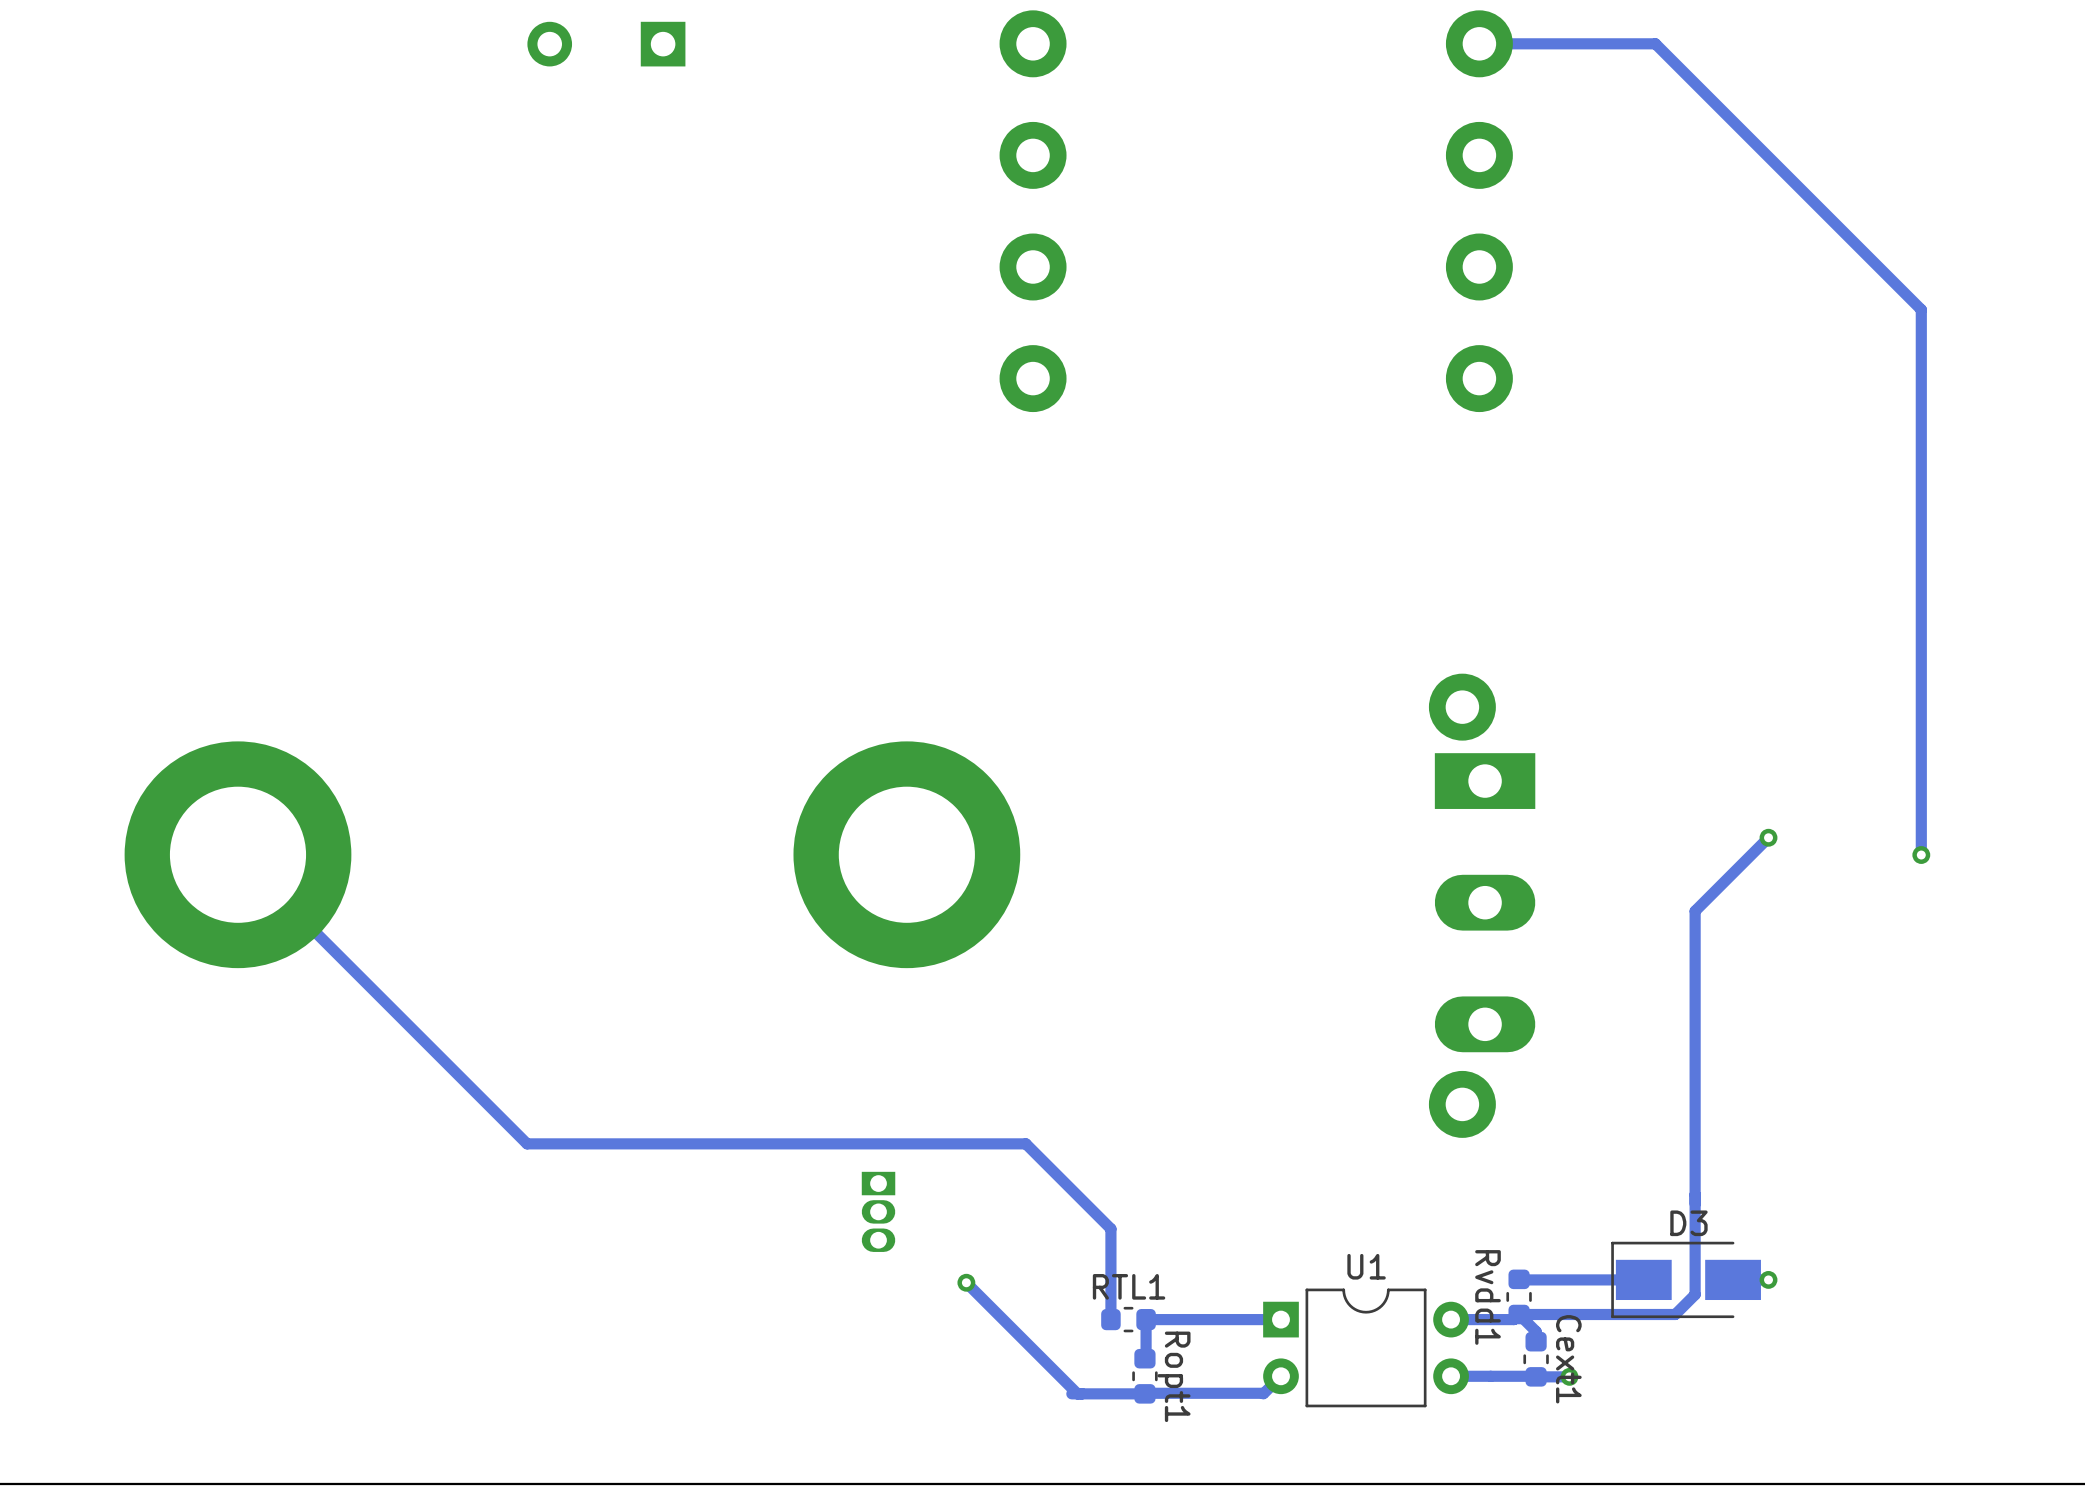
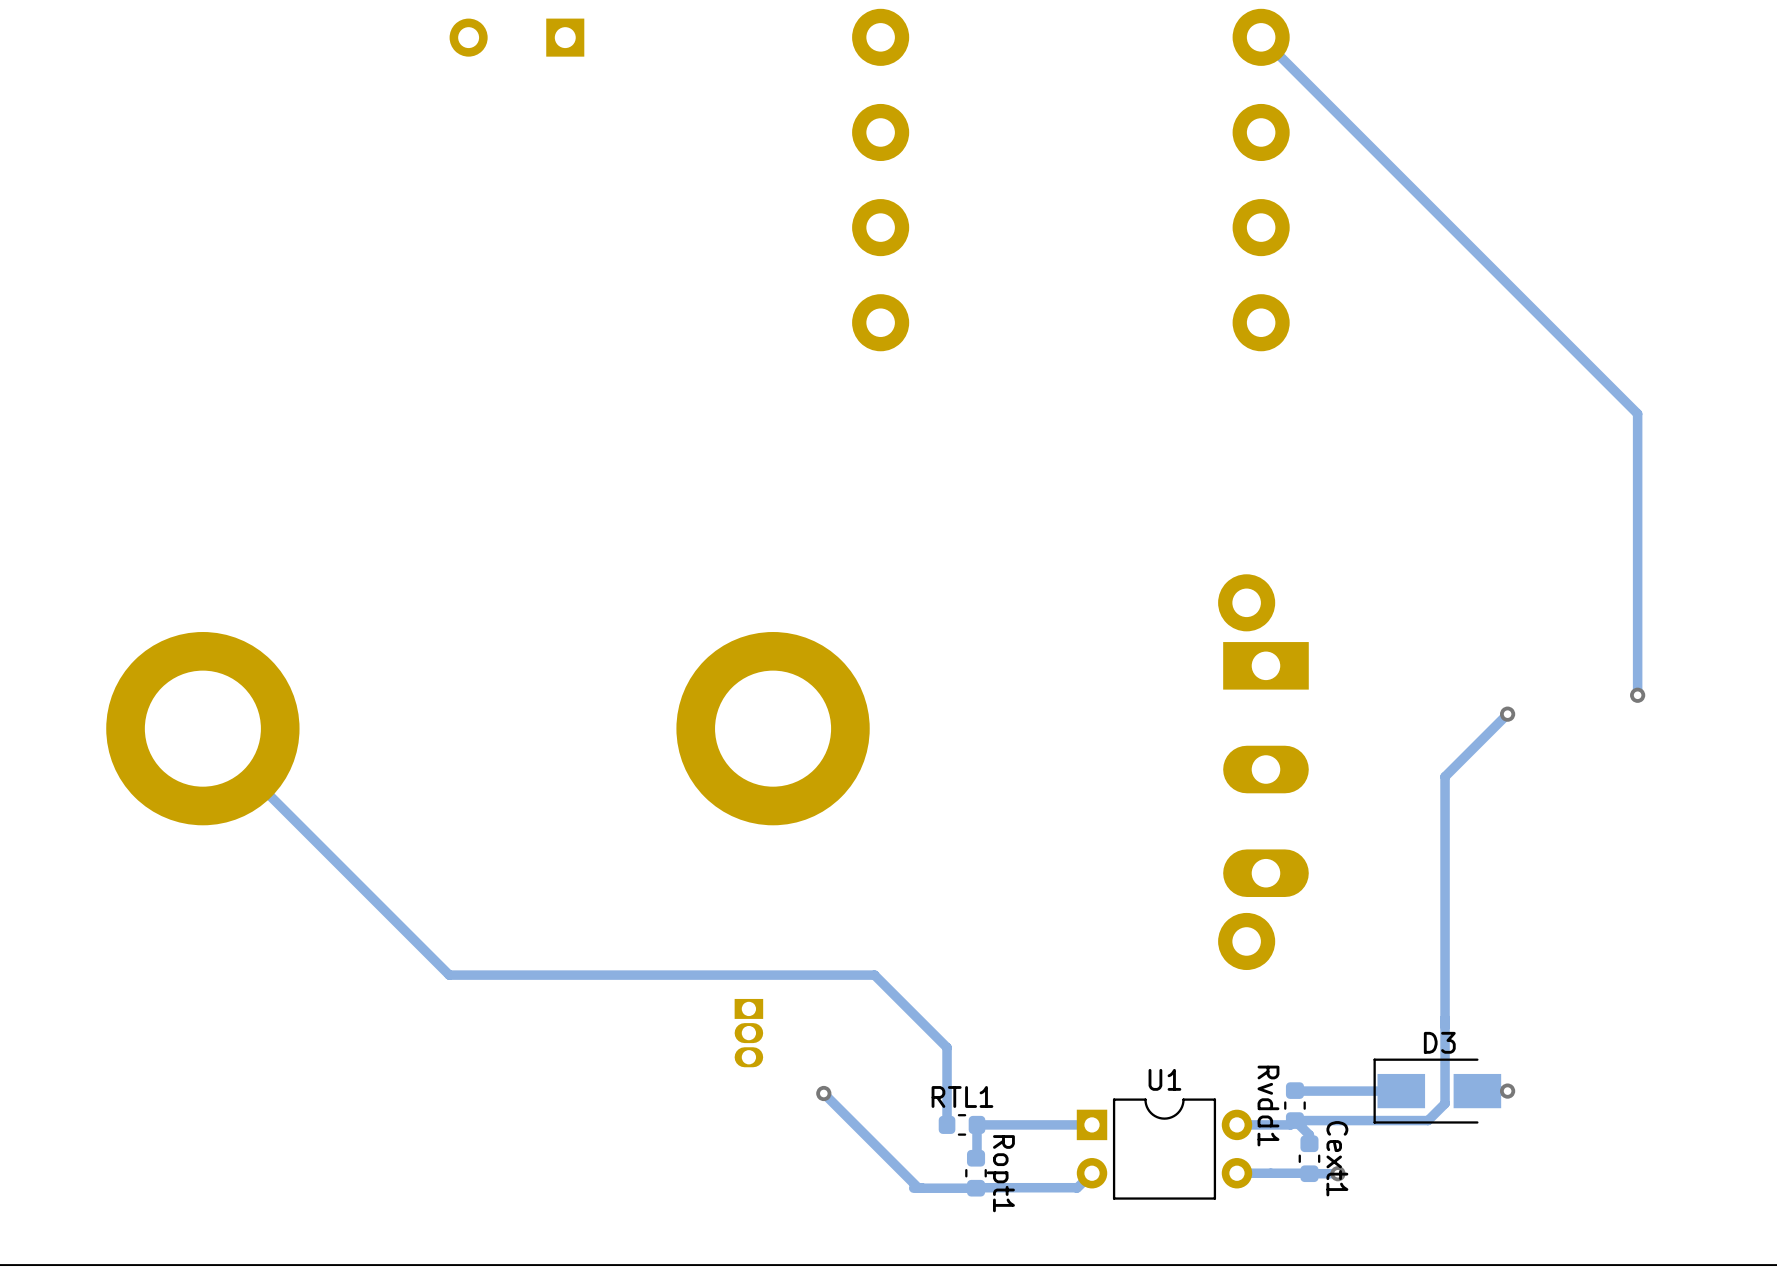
track: (1479, 43) (1655, 43) (1921, 309) (1921, 855) -> (1261, 37) (1637, 413) (1637, 695)
via position: (1921, 855) -> (1637, 695)

